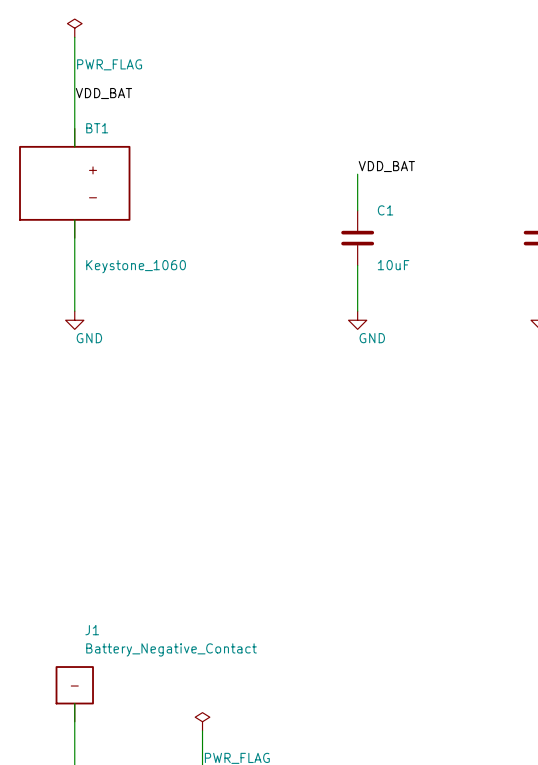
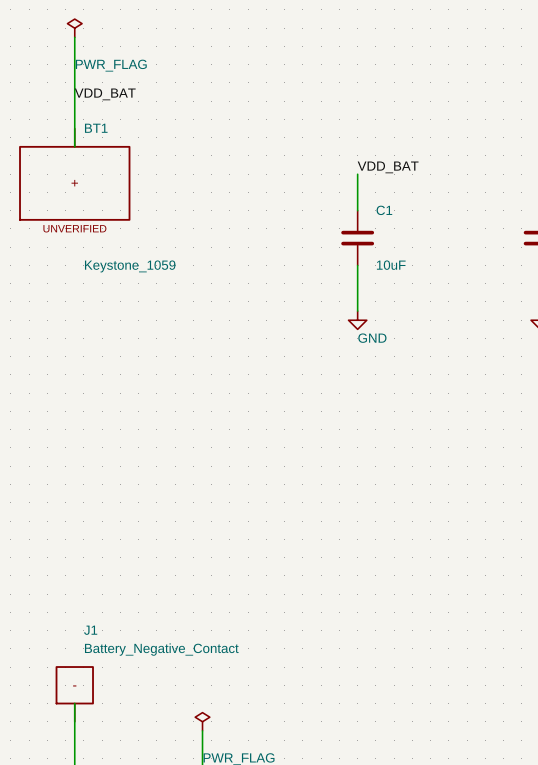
BT1 symbol: [19, 128, 131, 239] -> [19, 128, 131, 221]
wire: (74, 219) (74, 311) -> none
BT1 value: Keystone_1060 (136, 266) -> Keystone_1059 (130, 266)
power symbol: GND (74, 320) -> none

